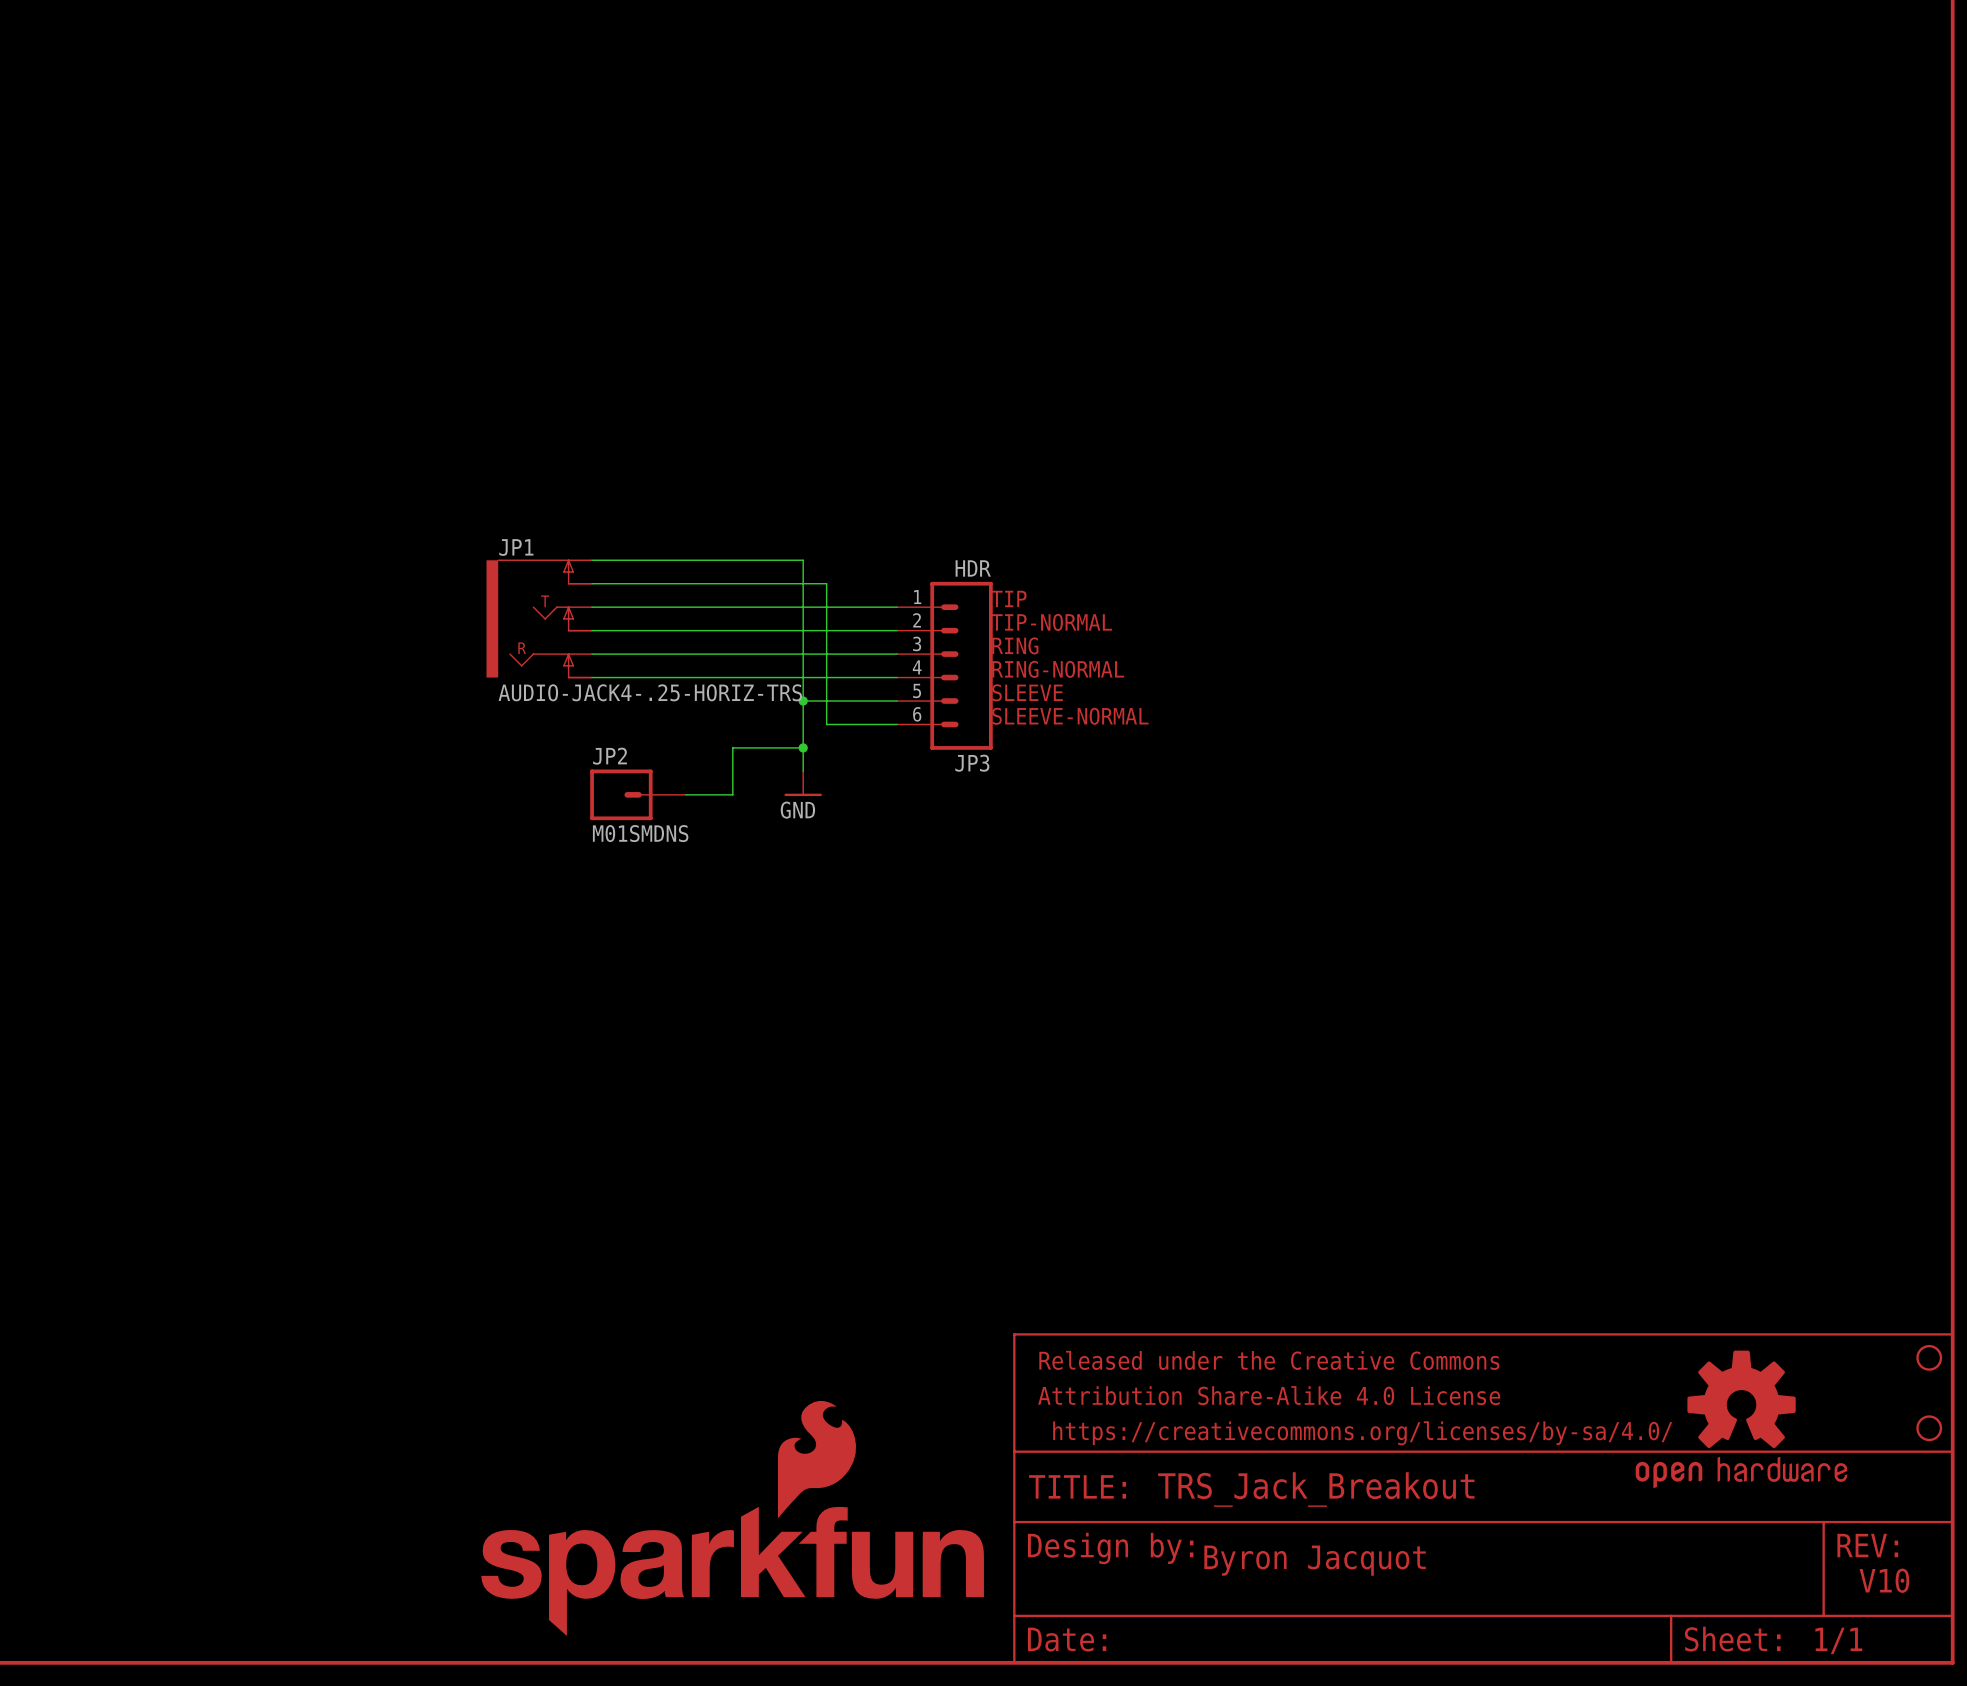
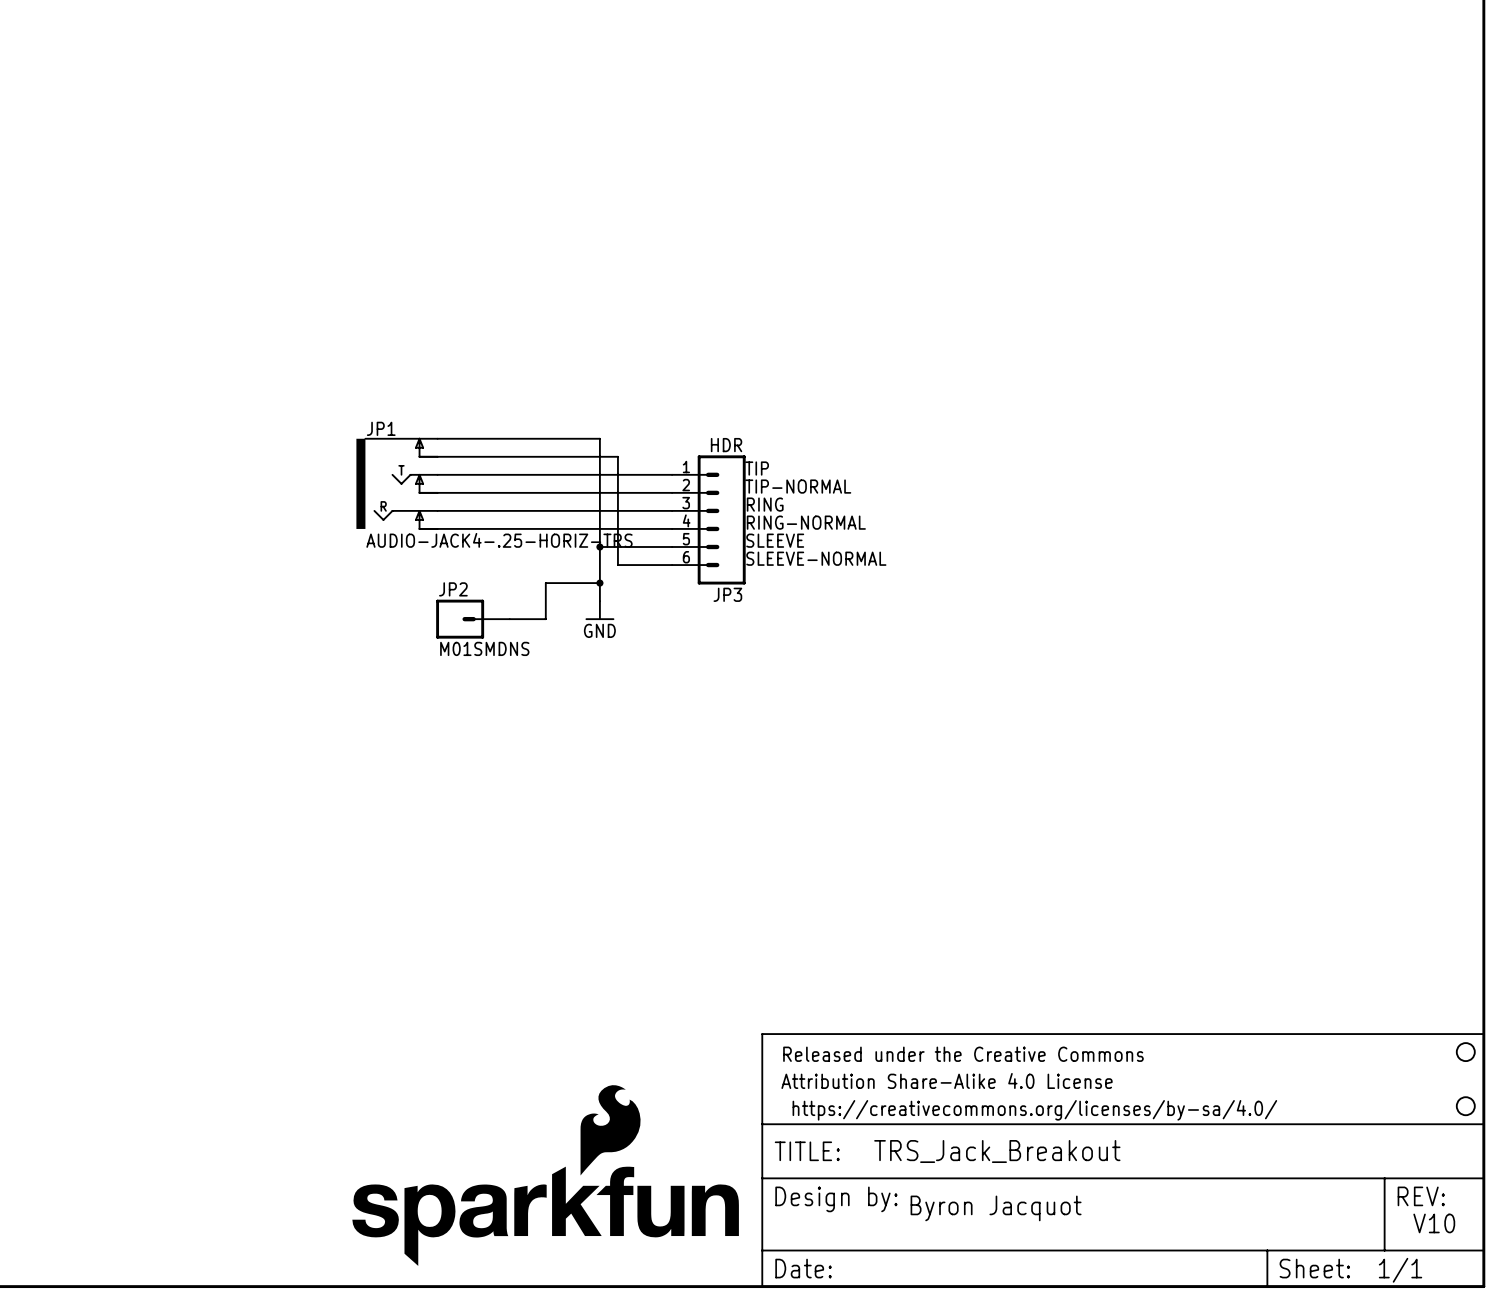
part: (1741, 1419) -> none

